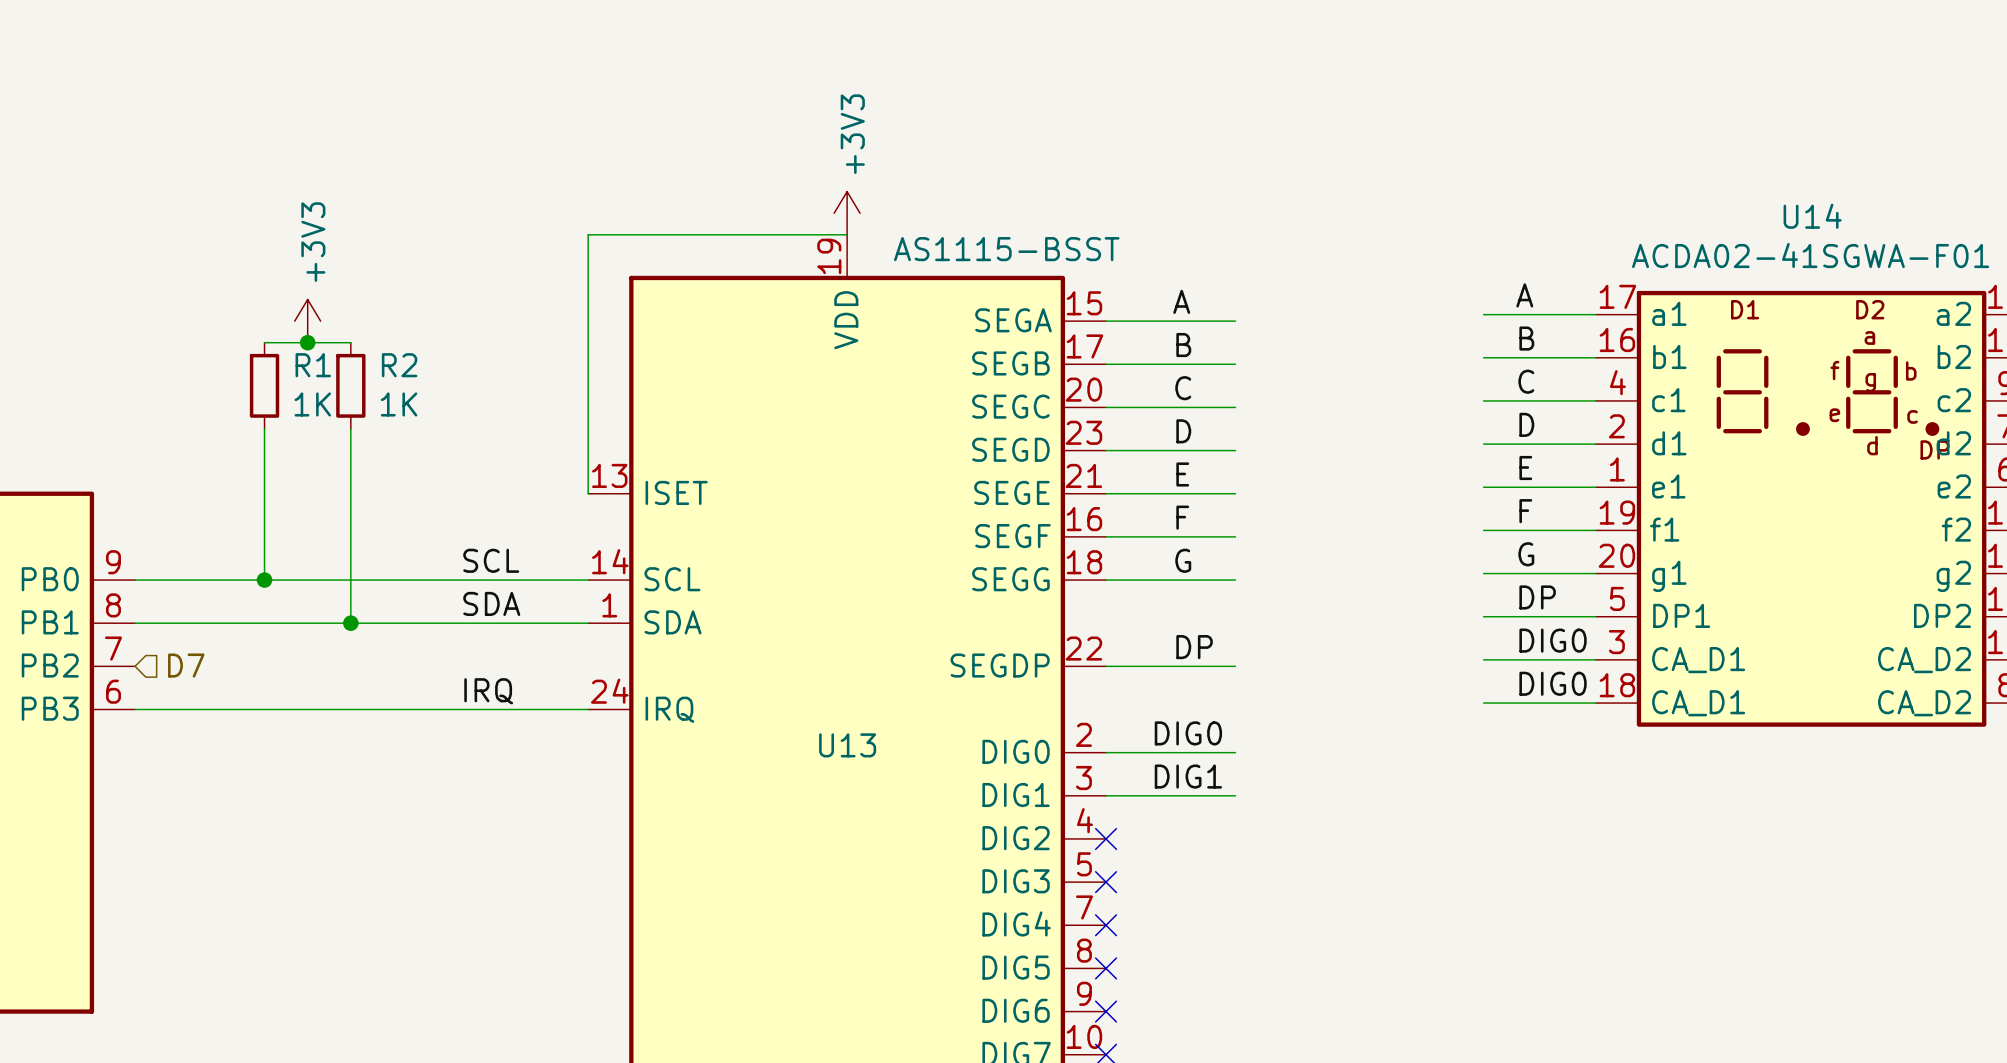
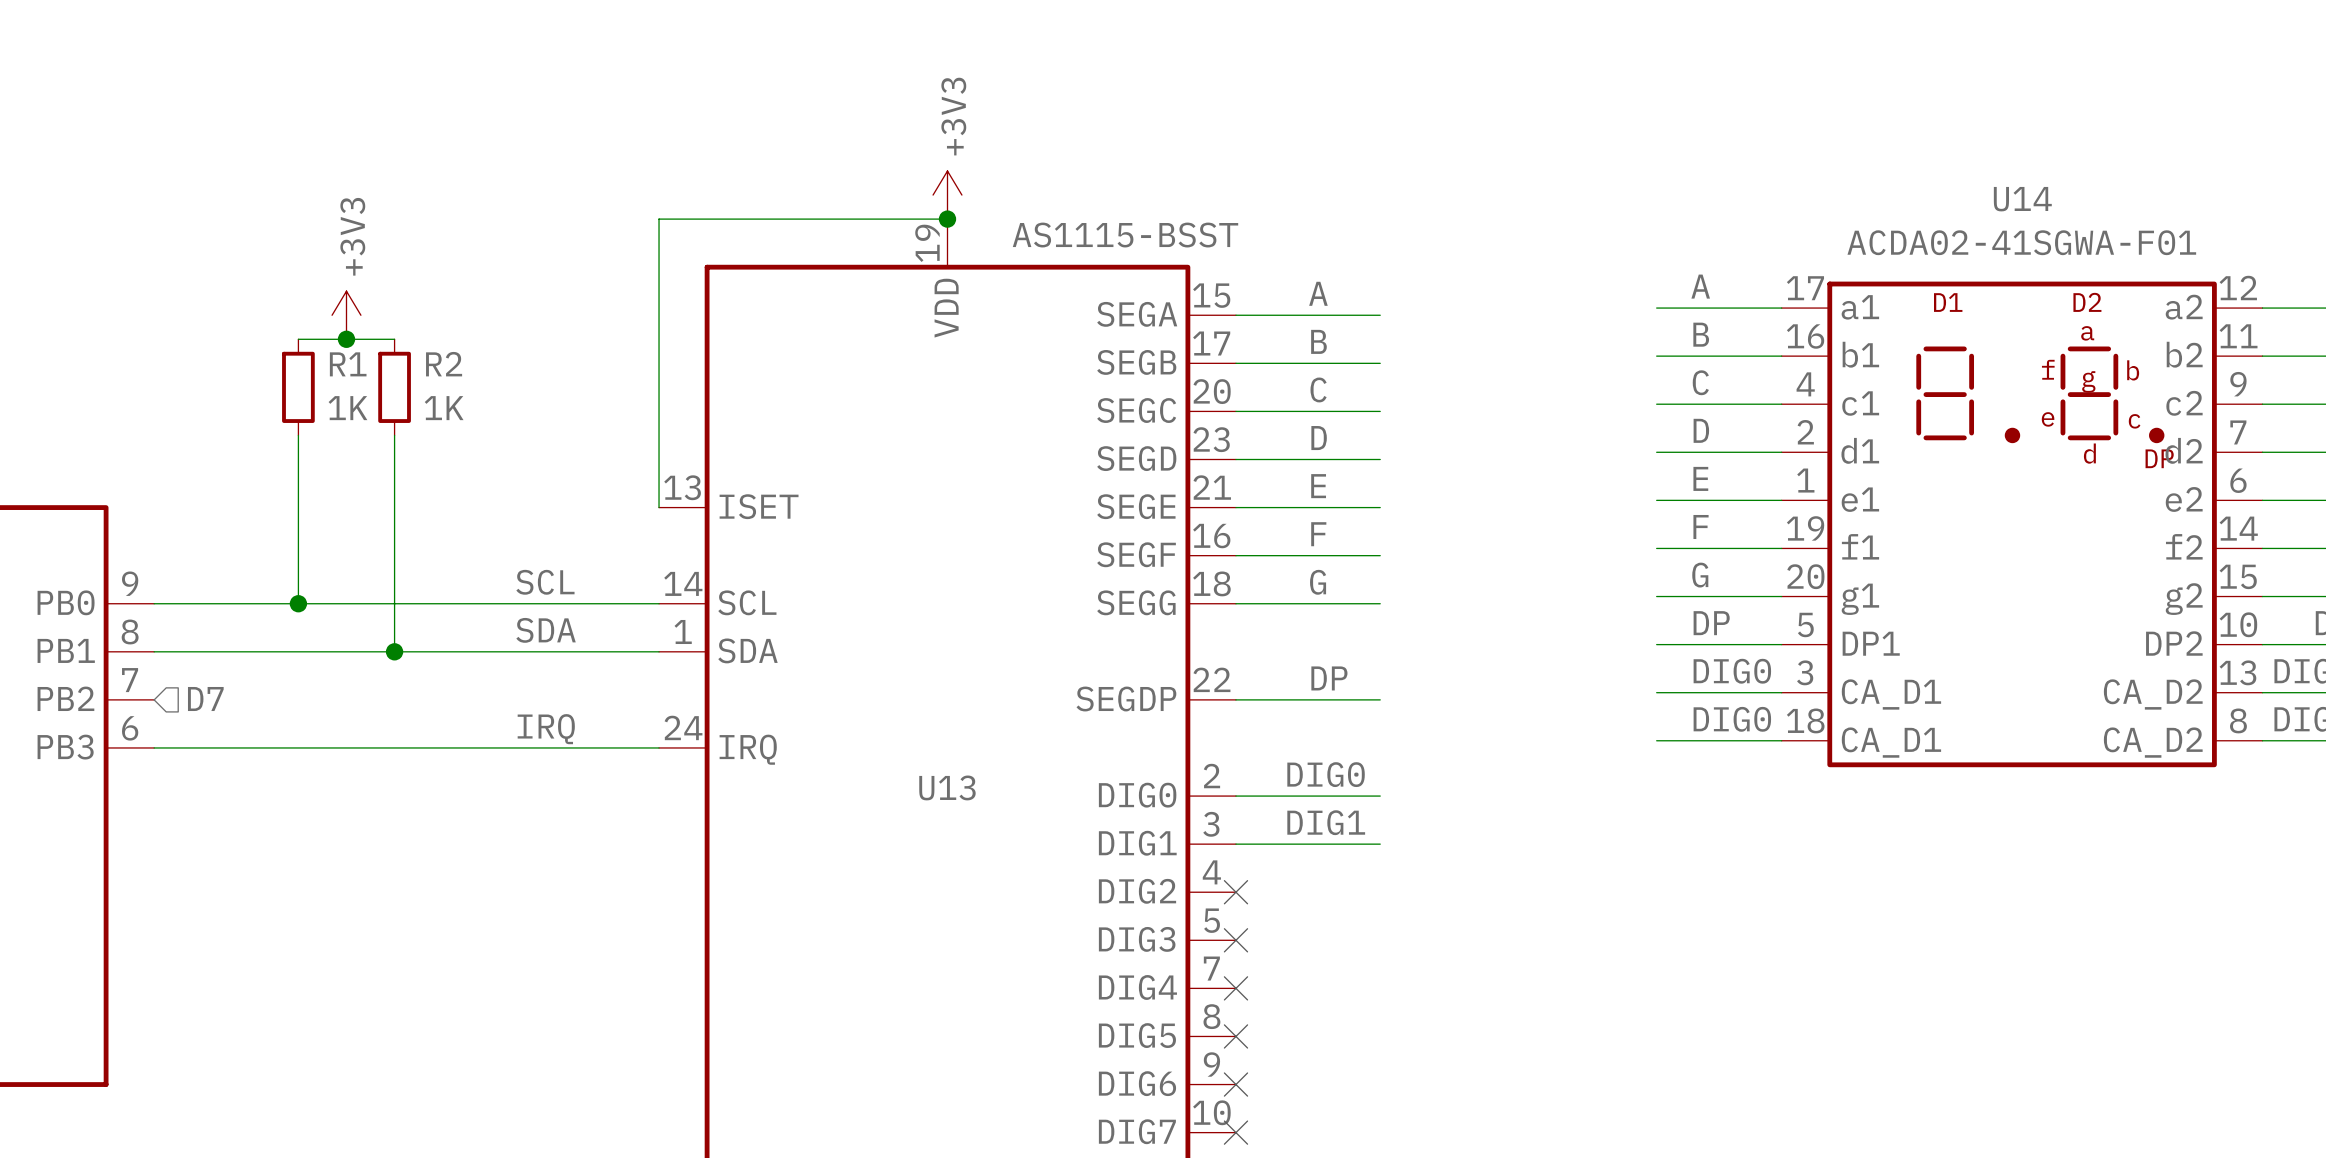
junction: none -> (947, 219)

